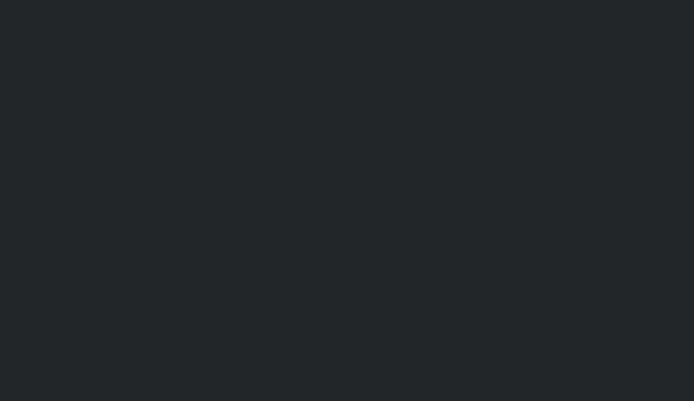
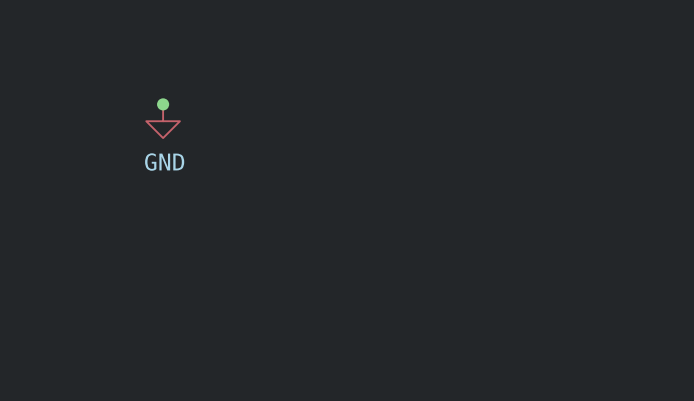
junction: none -> (163, 104)
power symbol: none -> GND (163, 121)

